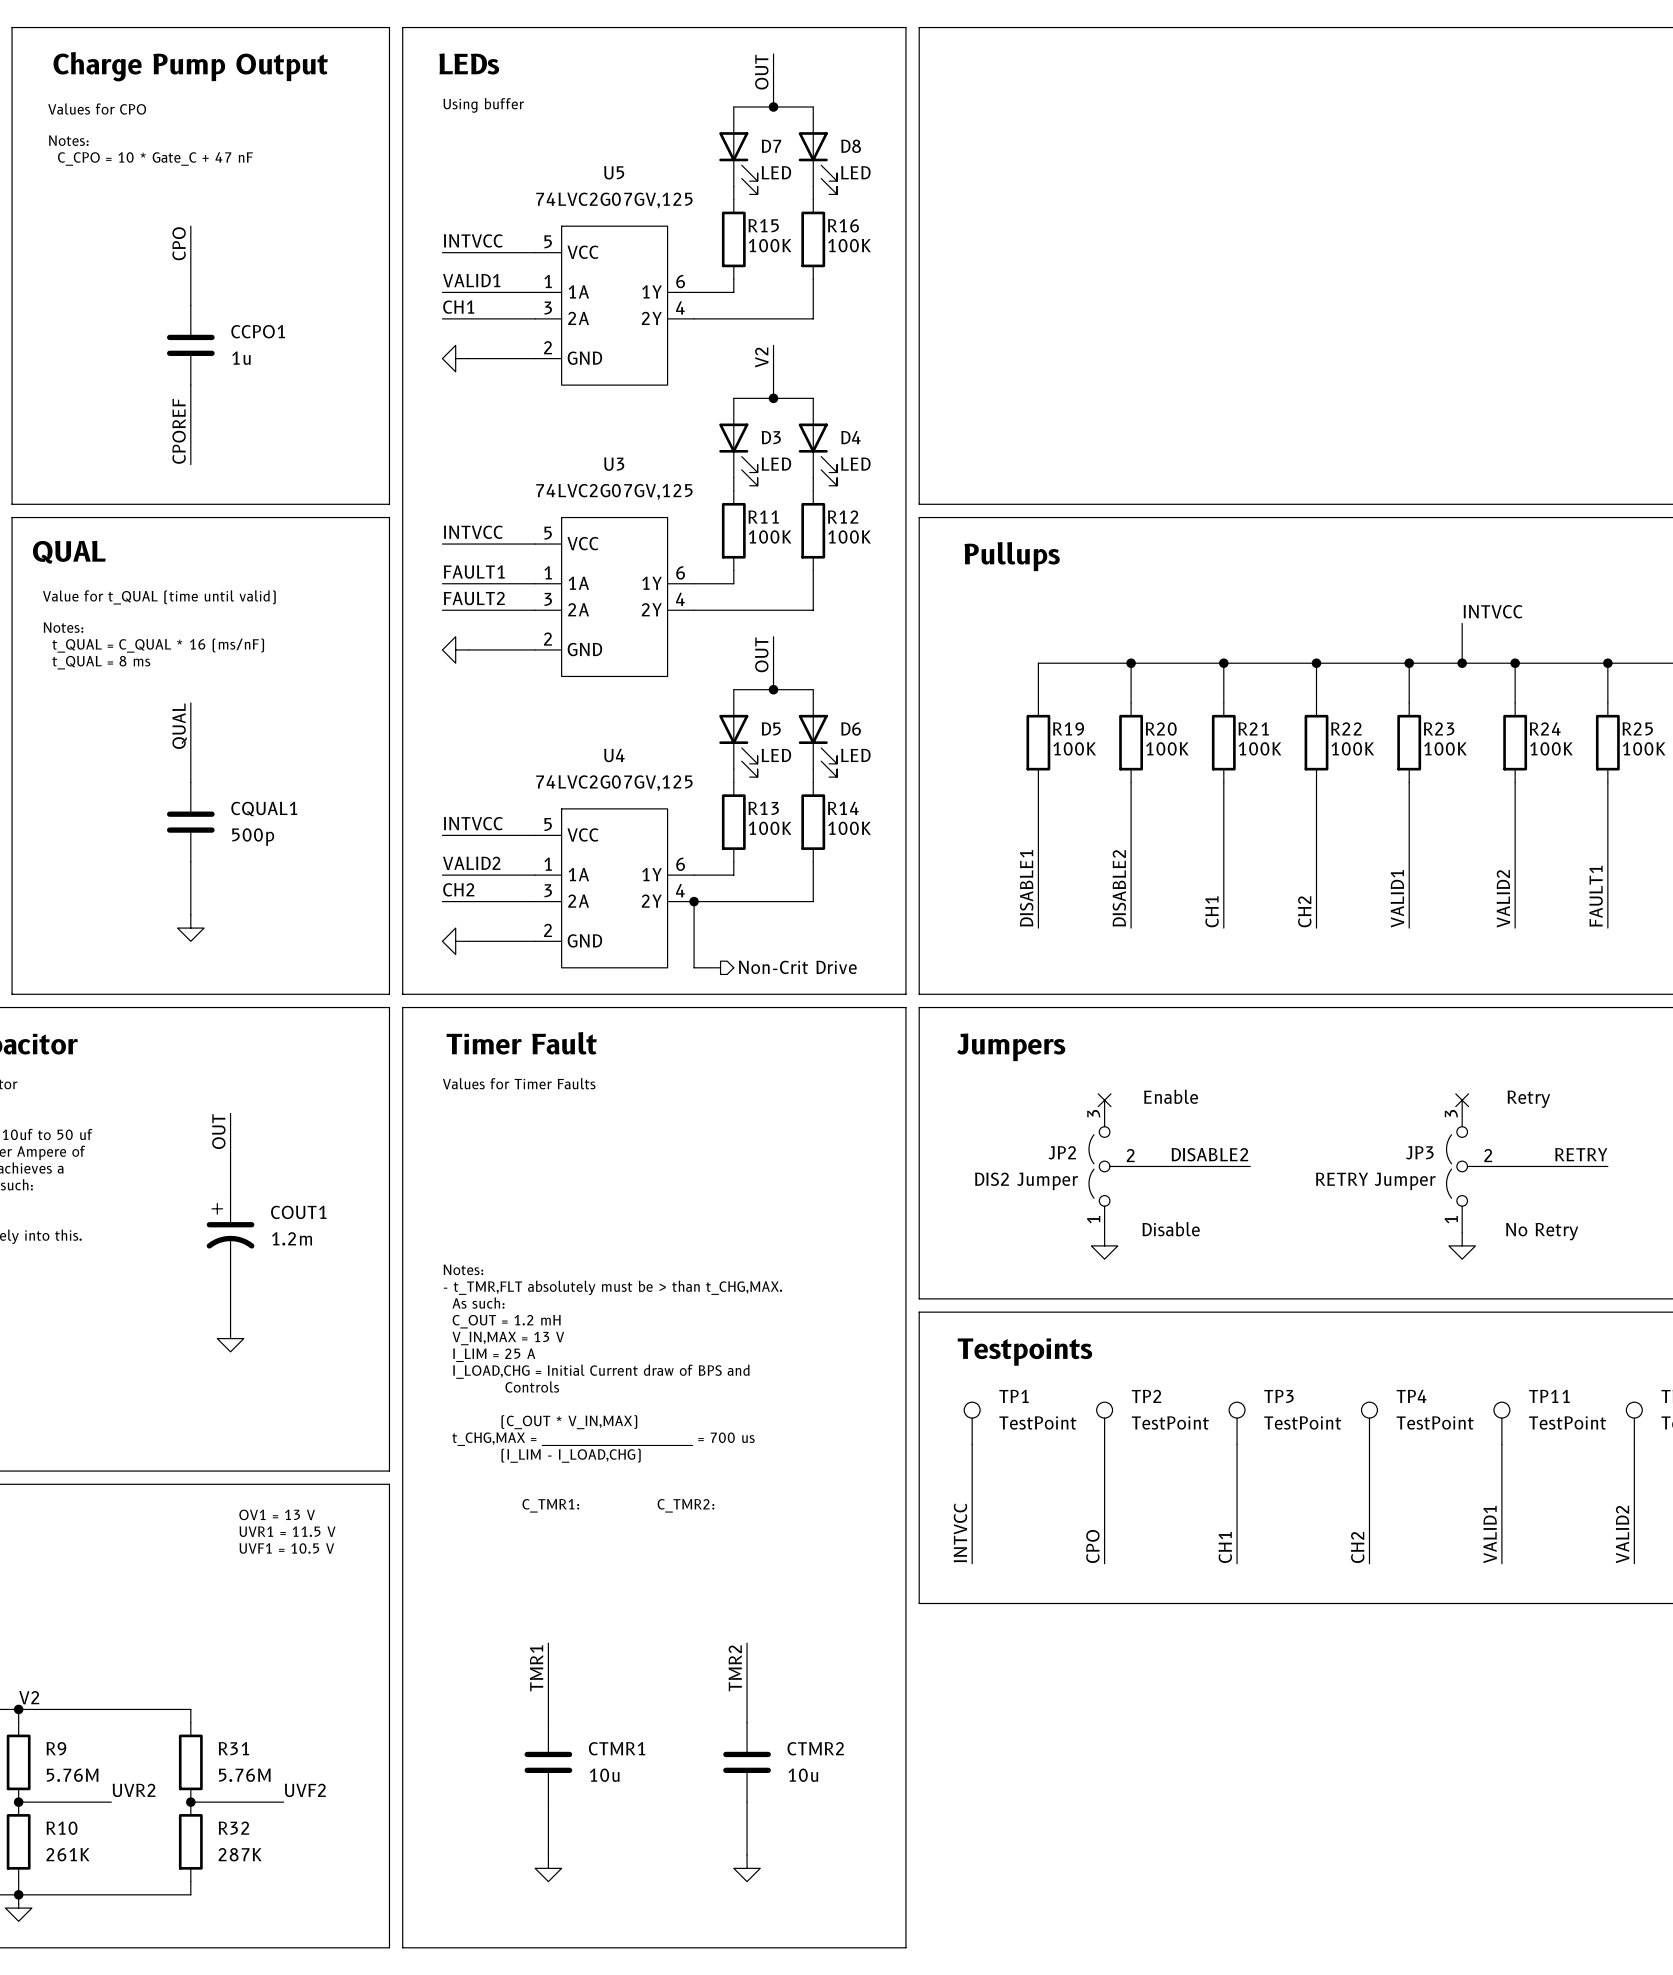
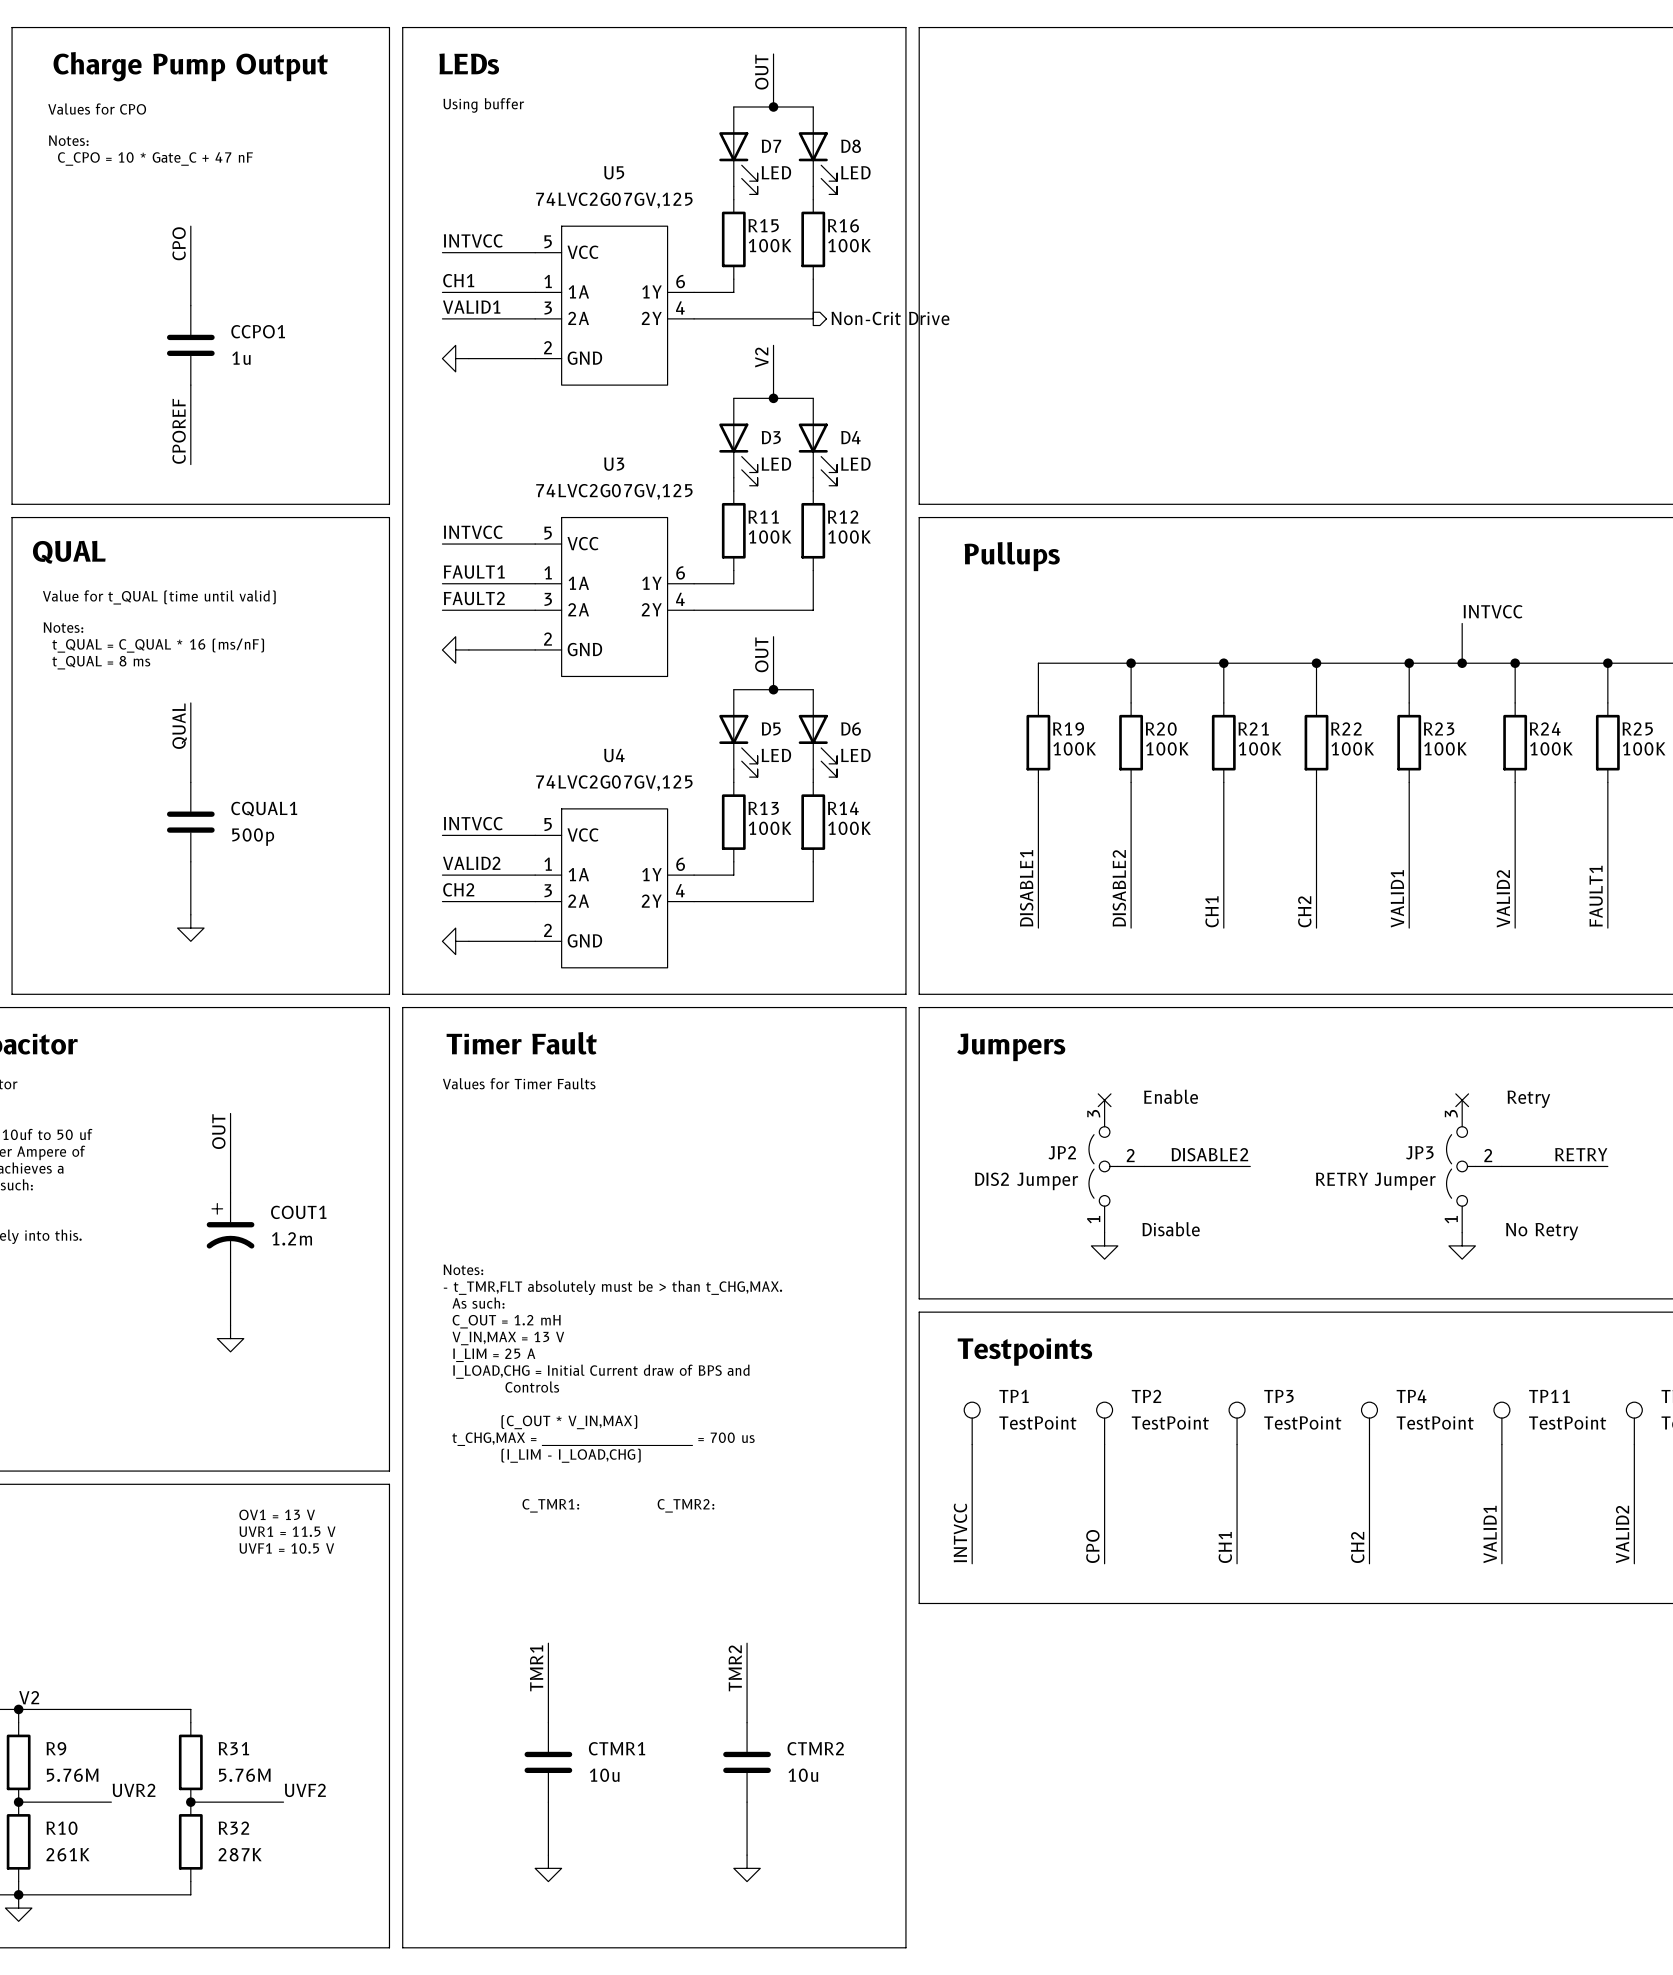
label: VALID1 (471, 280) -> CH1 (458, 280)
label: CH1 (458, 307) -> VALID1 (471, 307)
hierarchical label: none -> Non-Crit Drive (890, 318)
wire: (694, 901) (694, 967) (720, 967) -> none
junction: (694, 901) -> none
hierarchical label: Non-Crit Drive (797, 967) -> none

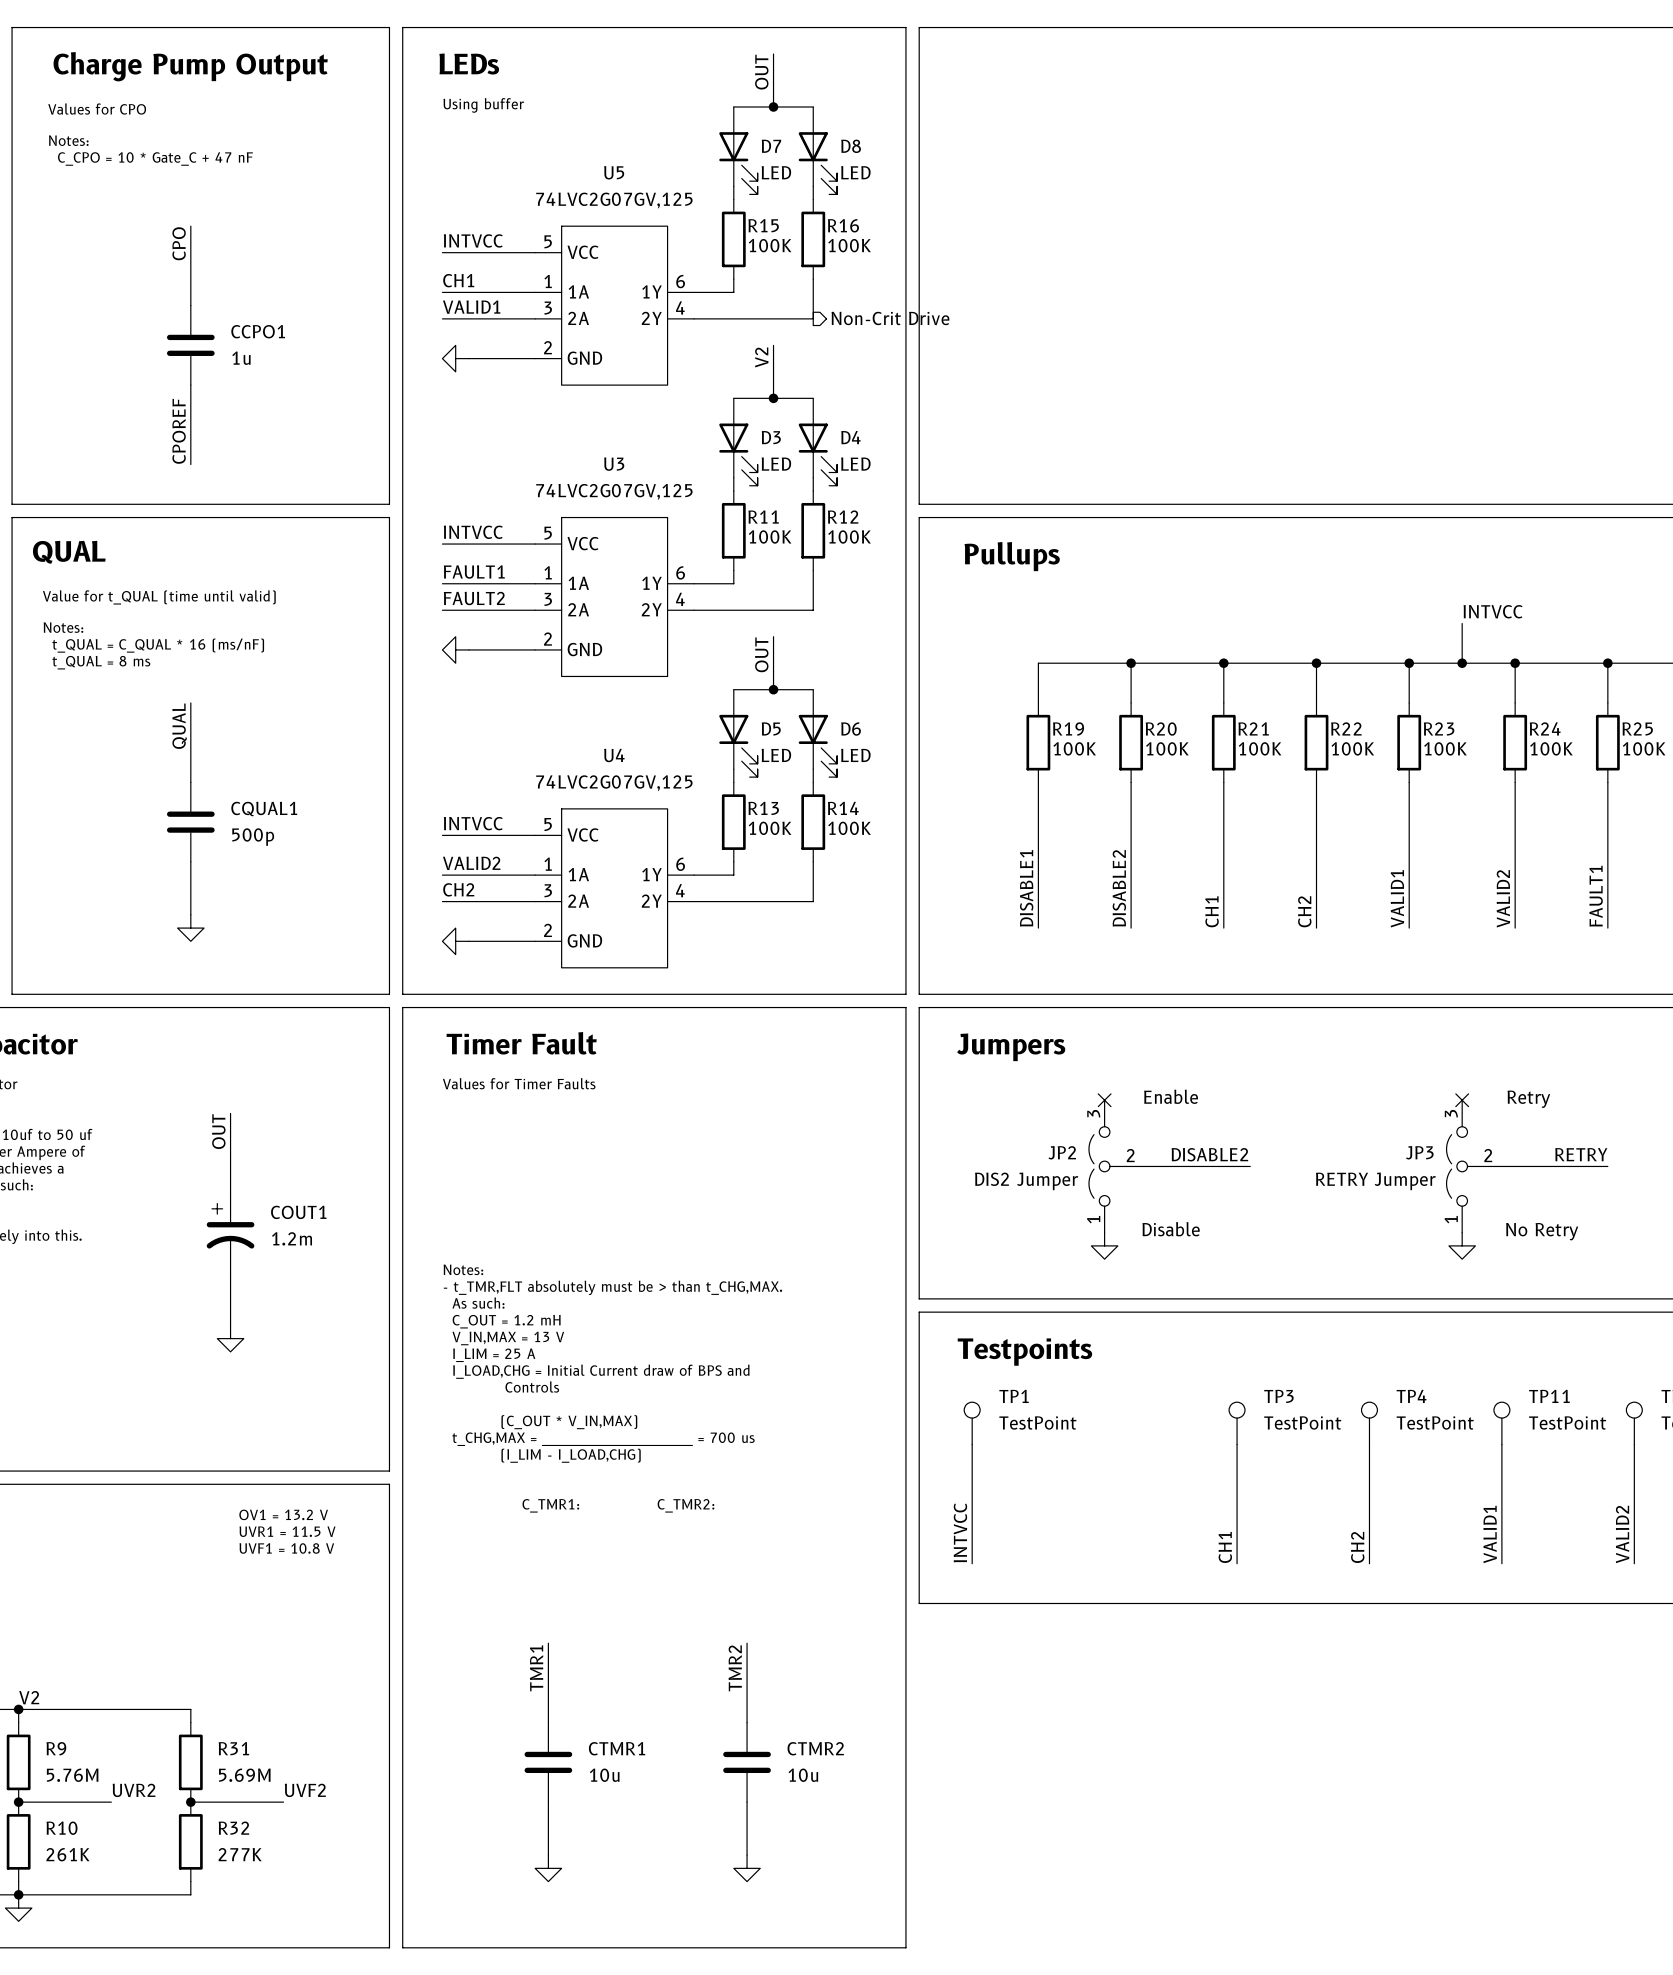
TP2: TestPoint (1104, 1423) -> none
wire: (1104, 1444) (1104, 1563) -> none
text: OV1 = 13 V (277, 1514) -> OV1 = 13.2 V (283, 1514)
label: CPO (1092, 1546) -> none
text: UVF1 = 10.5 V (286, 1548) -> UVF1 = 10.8 V (286, 1548)
R31 value: 5.76M (244, 1775) -> 5.69M (244, 1775)
R32 value: 287K (240, 1854) -> 277K (240, 1854)

